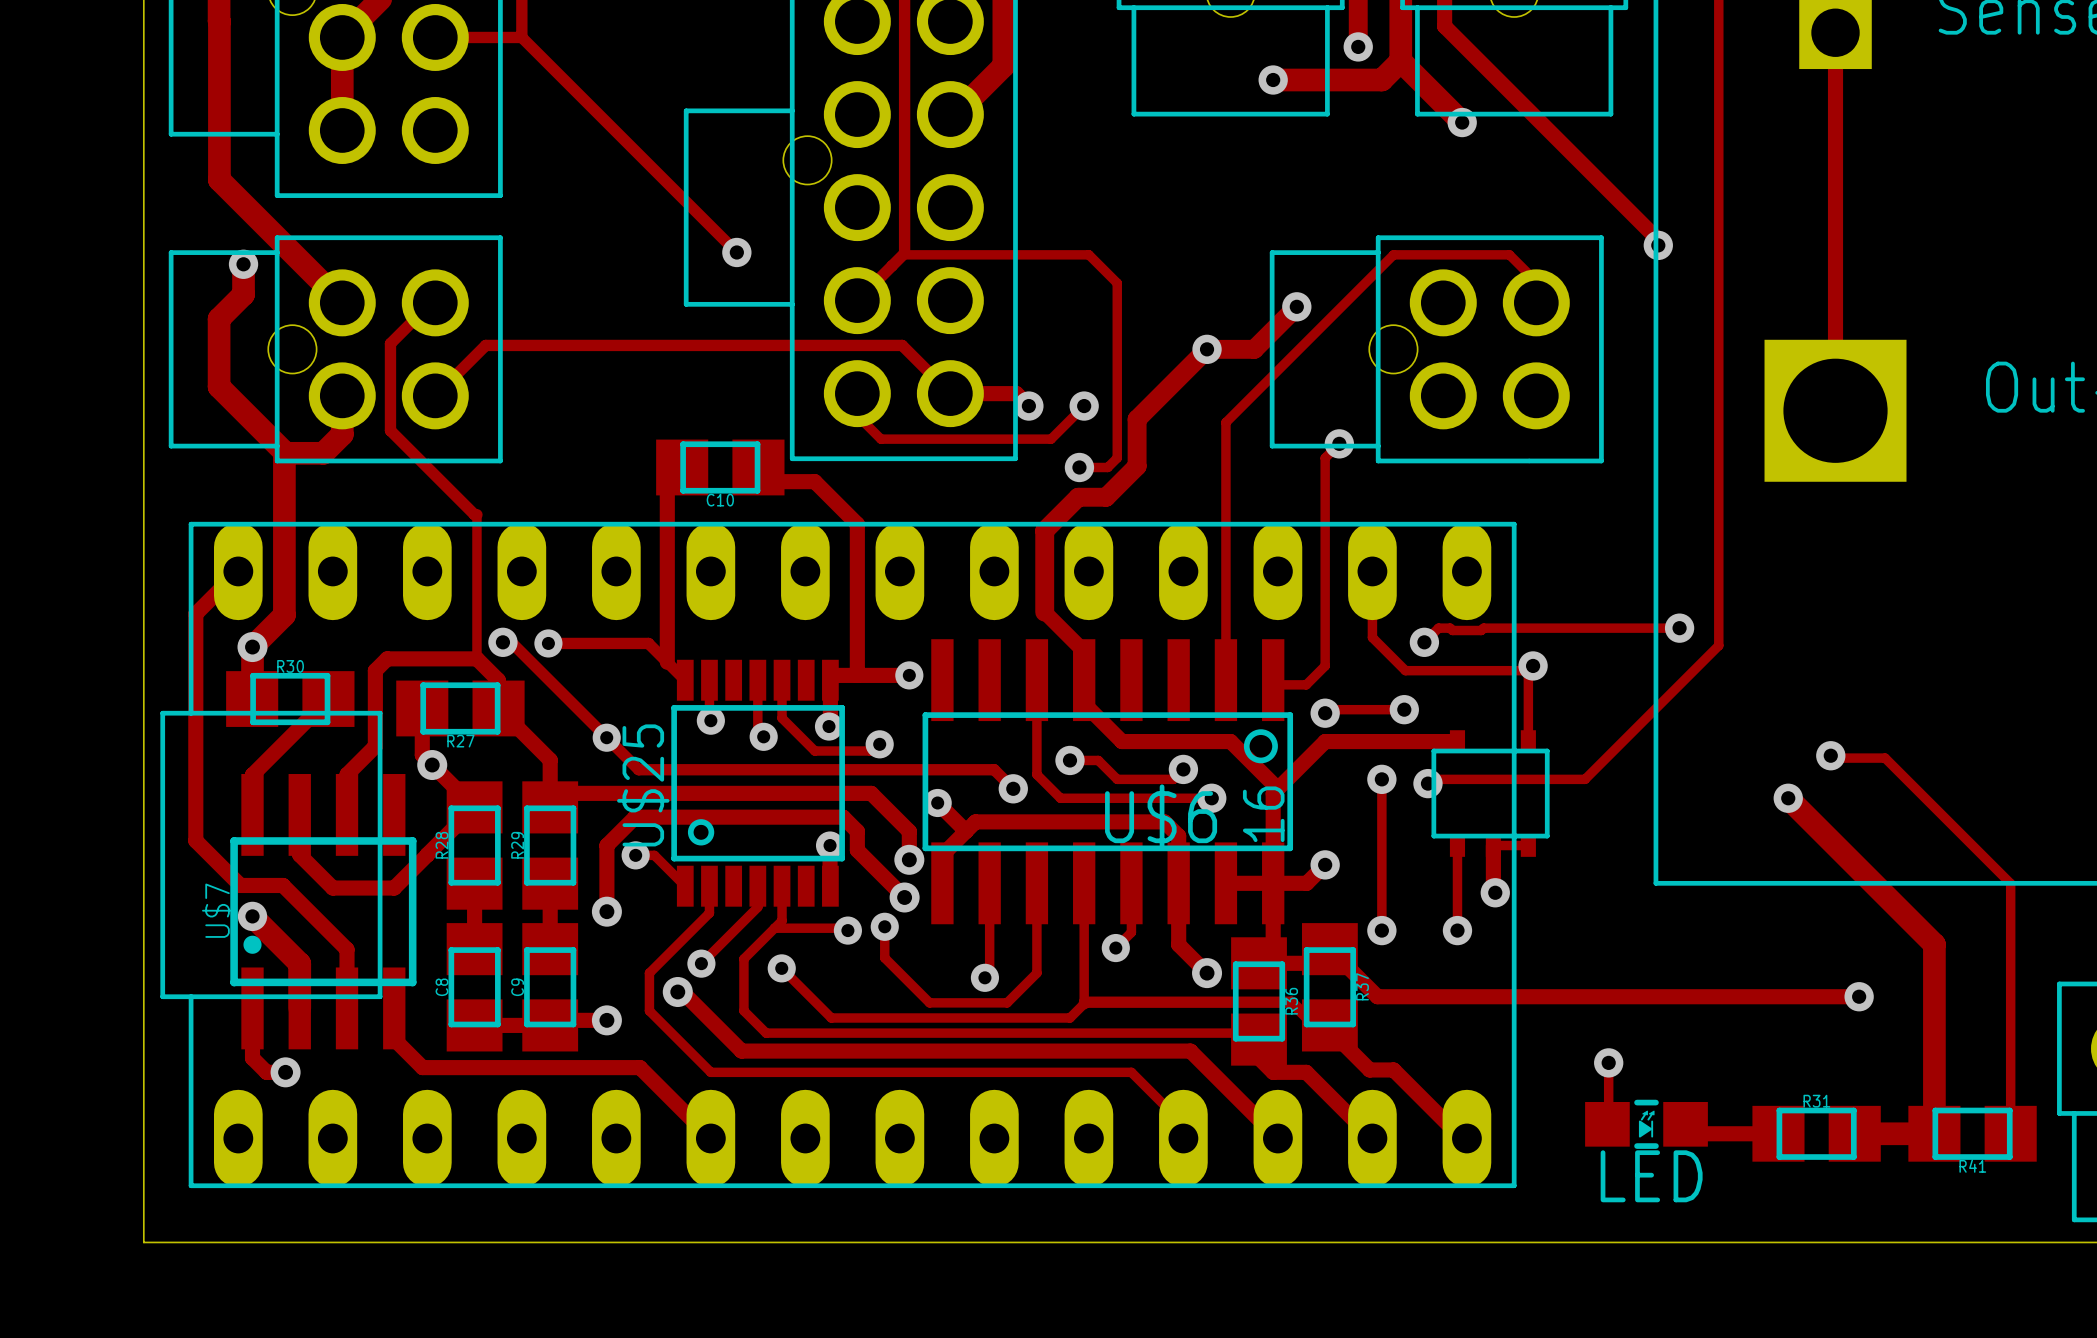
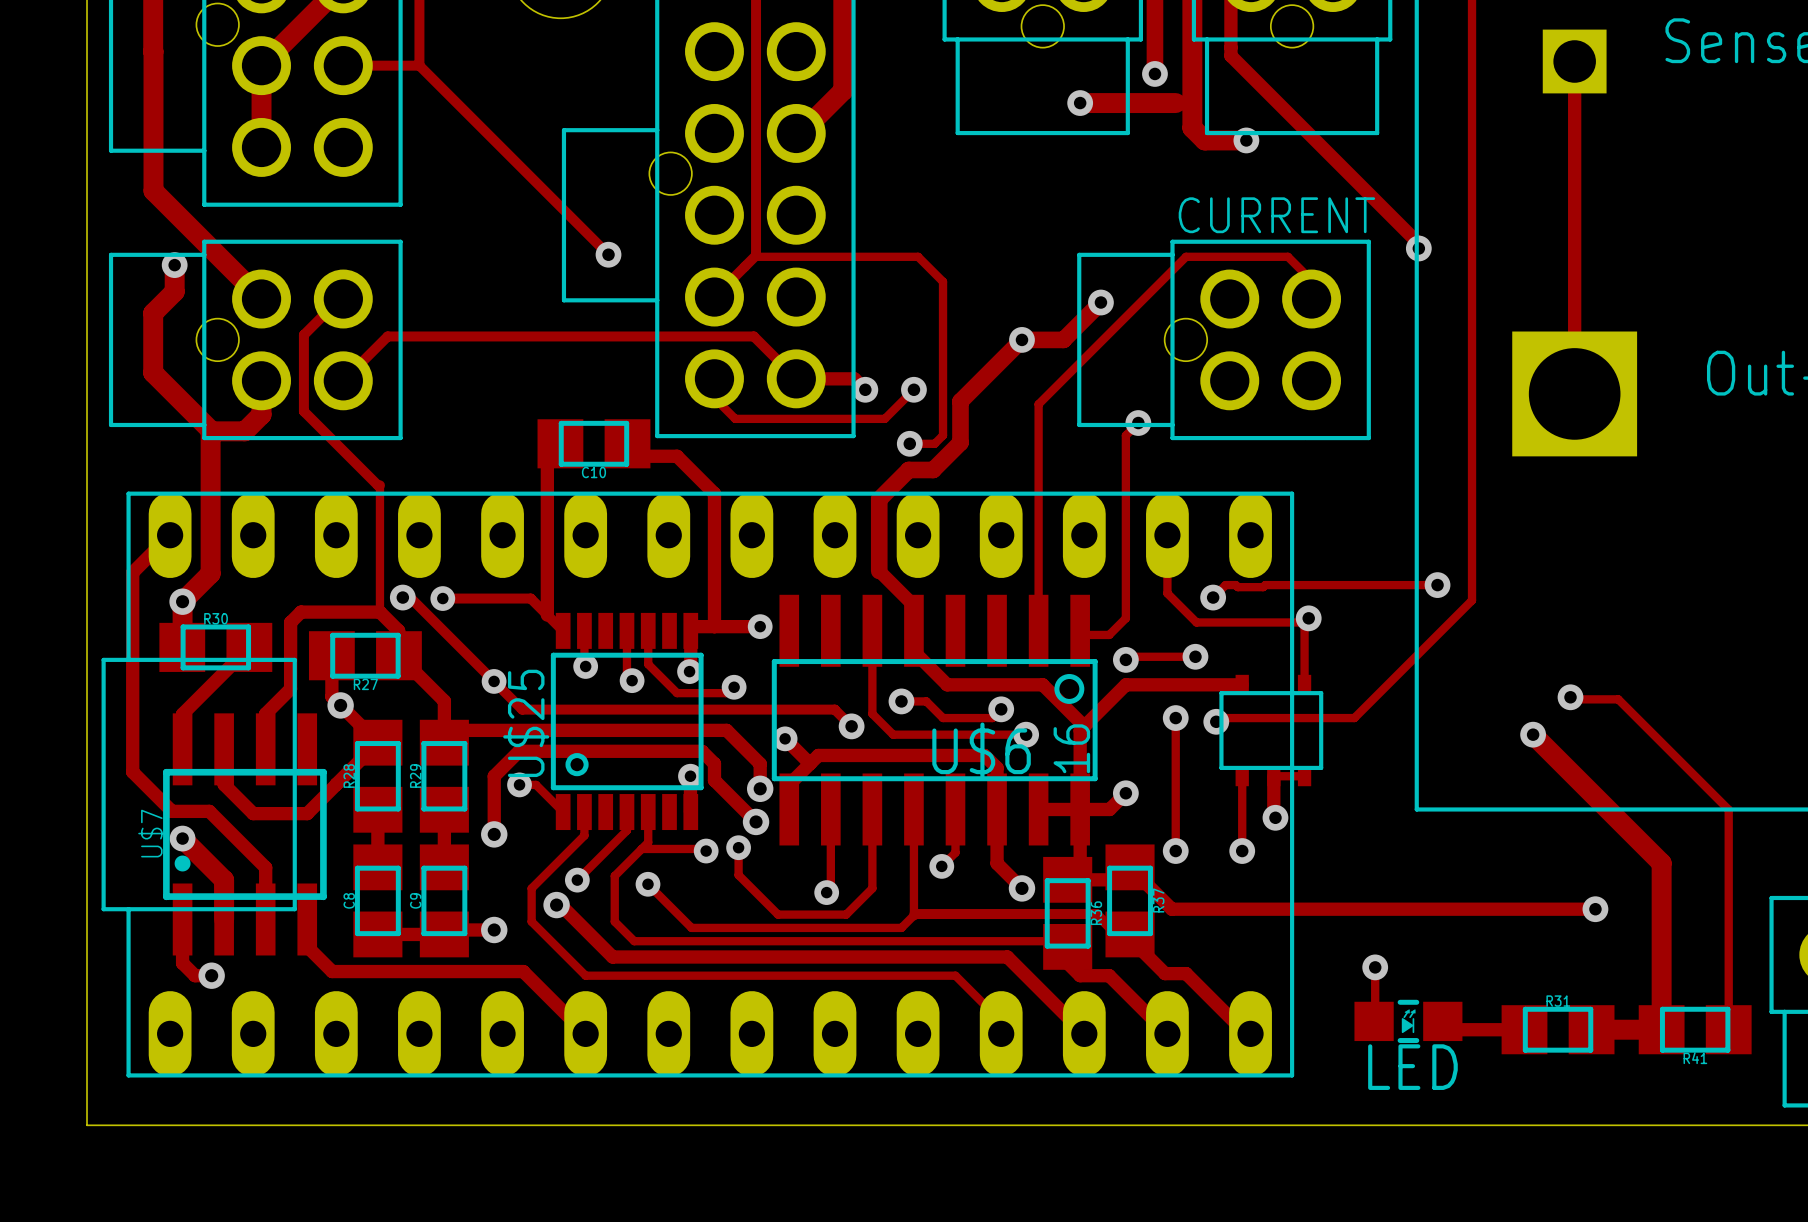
track: (1381, 80) (1400, 61) (1462, 122) -> (1192, 86) (1192, 127) (1204, 140) (1246, 140)
CURRENT name: none -> CURRENT (1276, 215)

